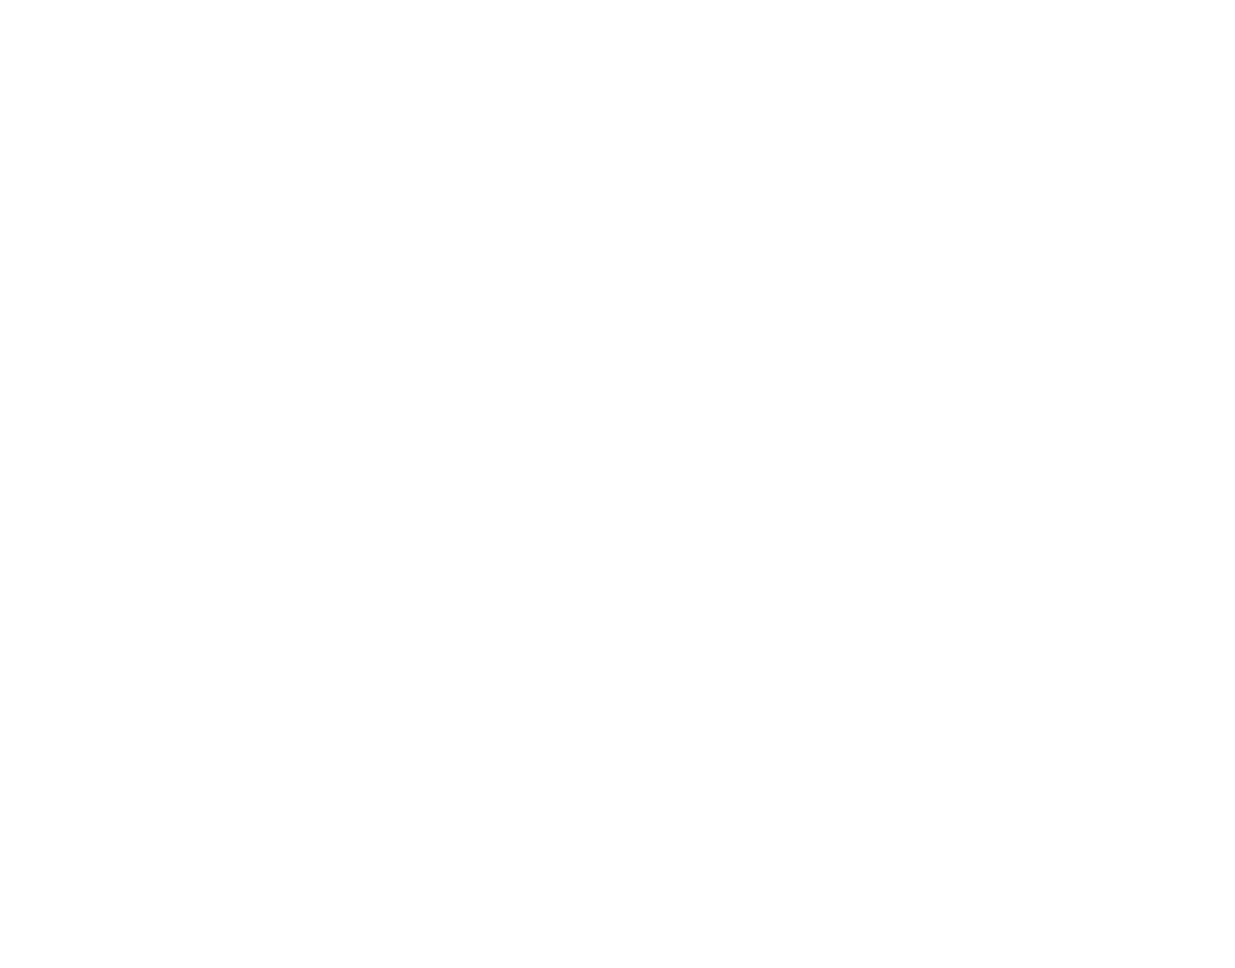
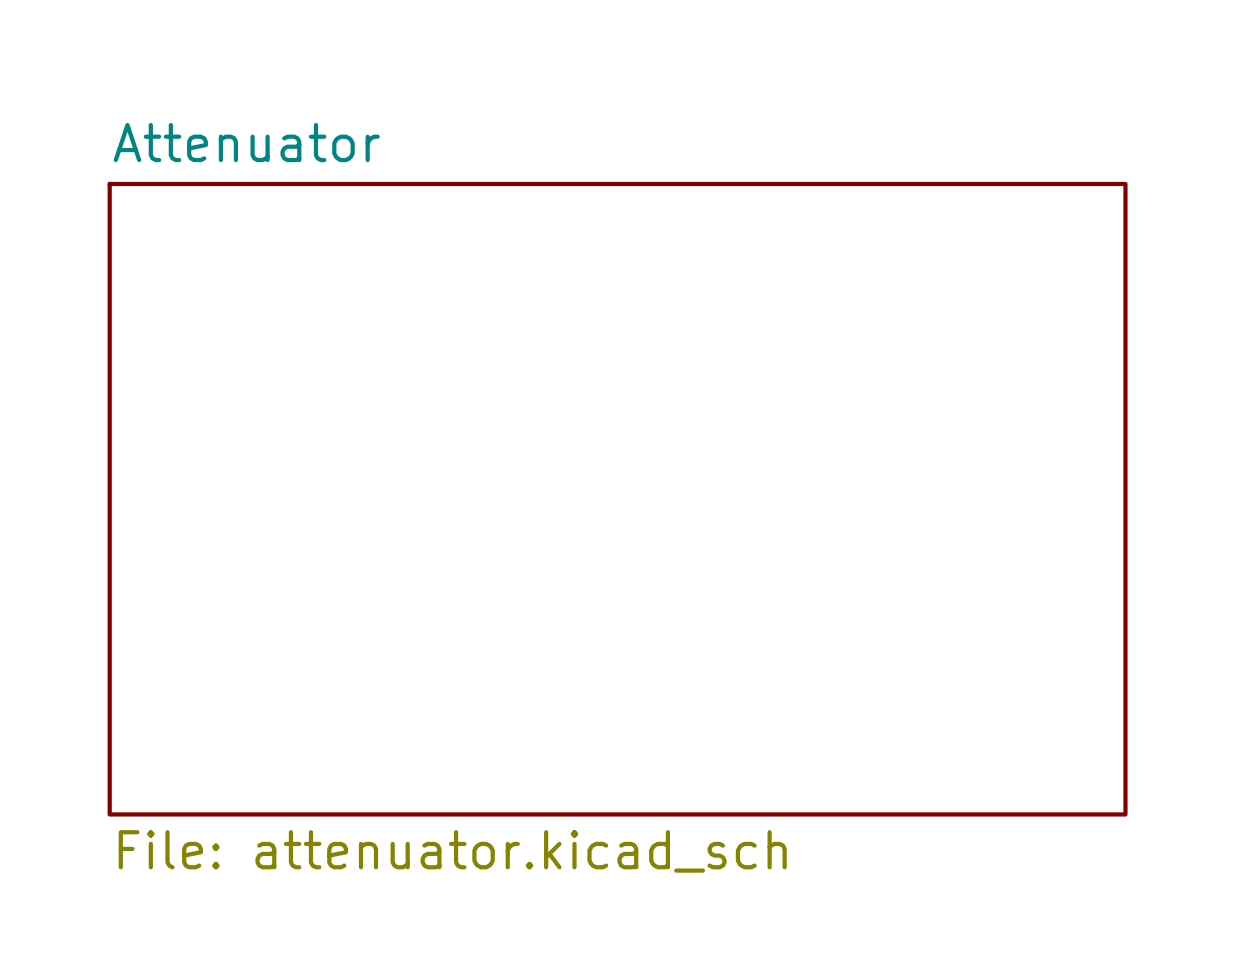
sheet Attenuator: none -> File: attenuator.kicad_sch (617, 499)

